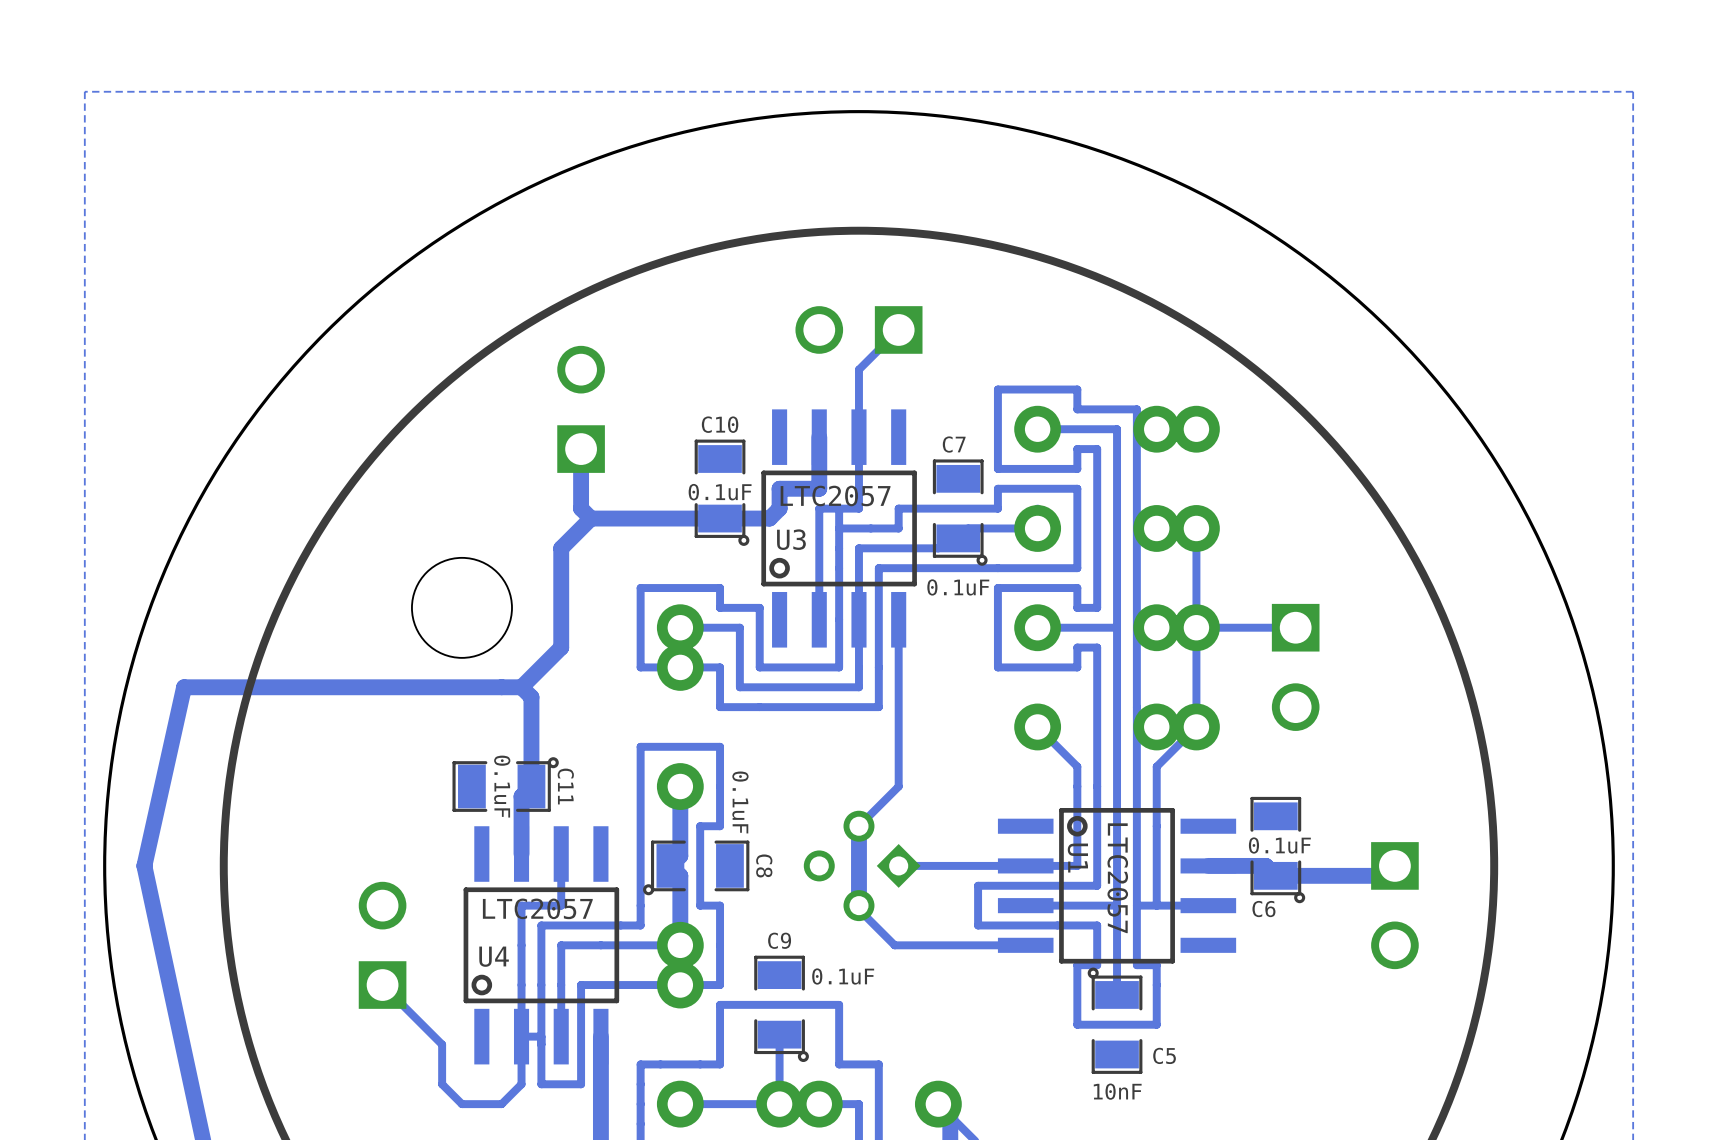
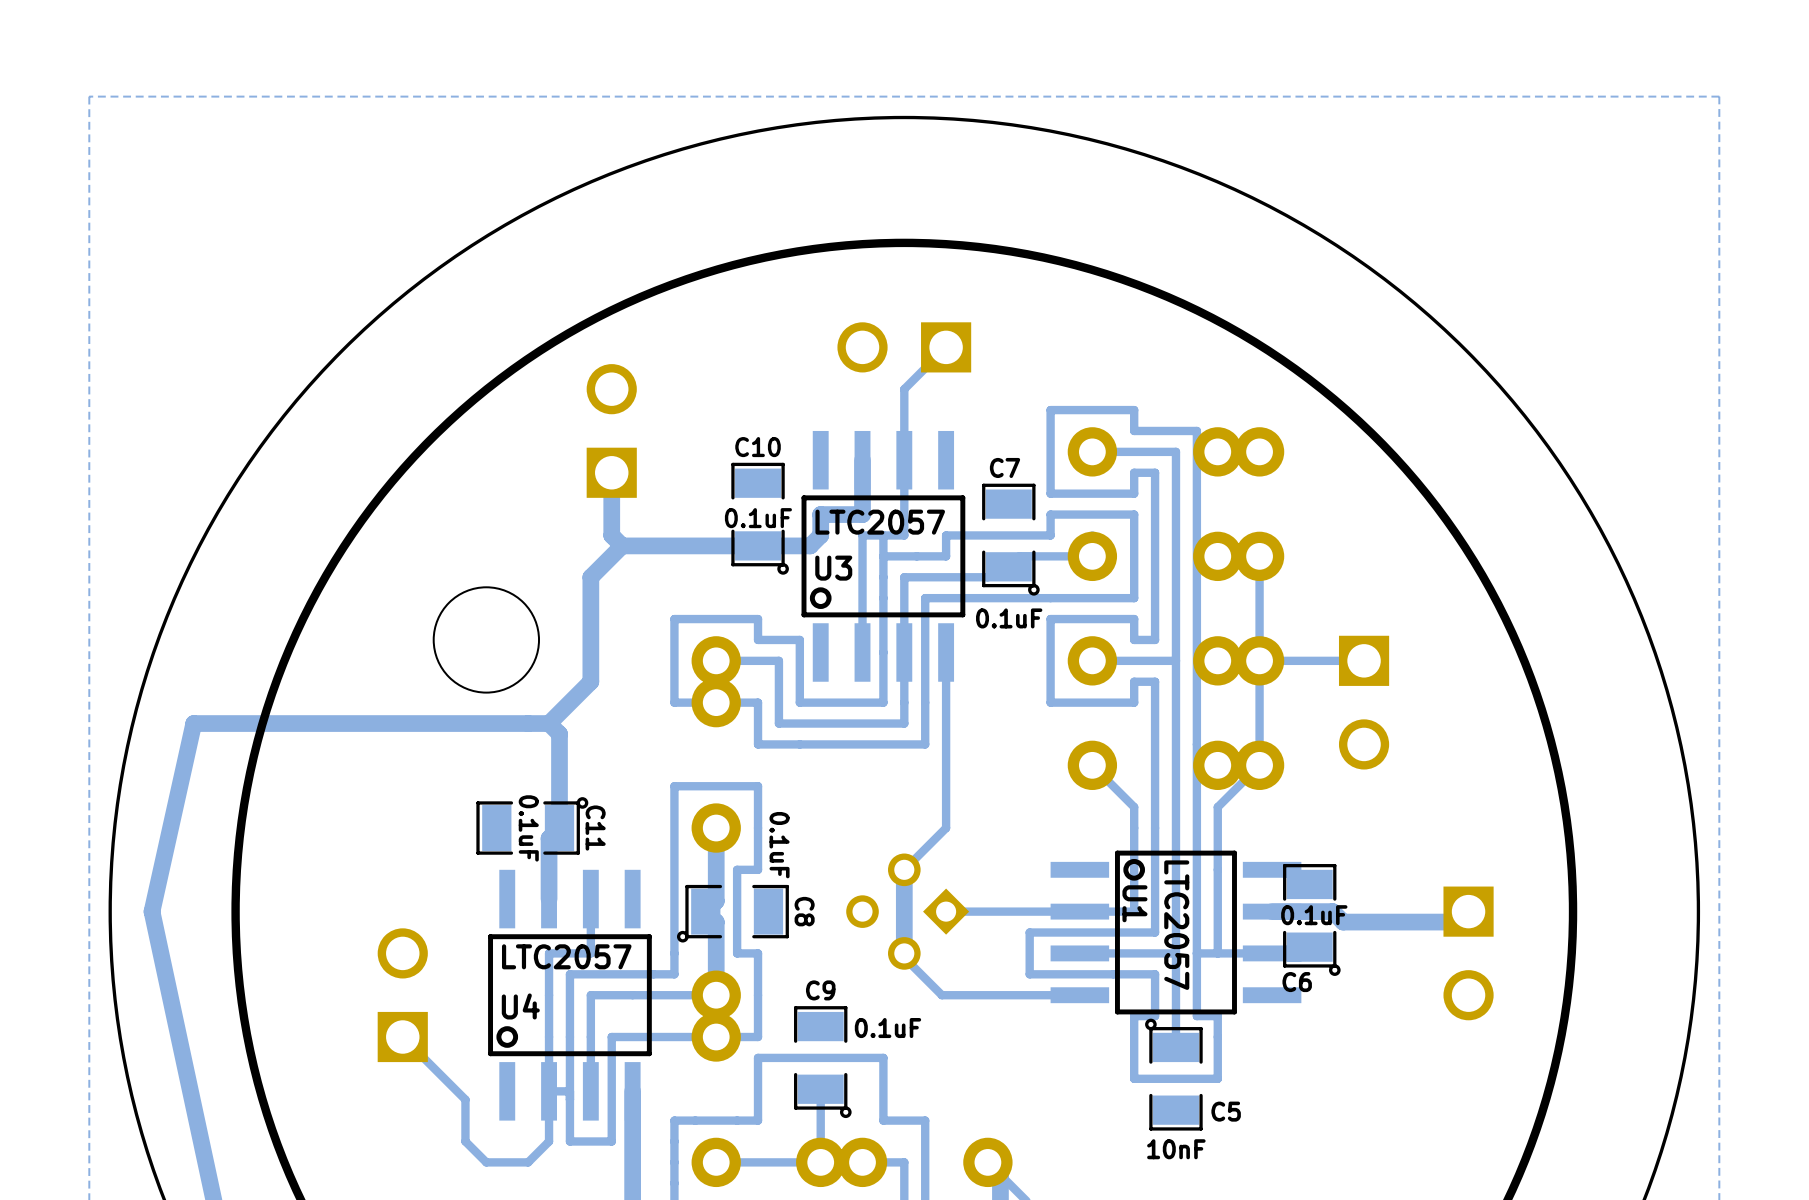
C6 position: (1277, 850) -> (1311, 919)

